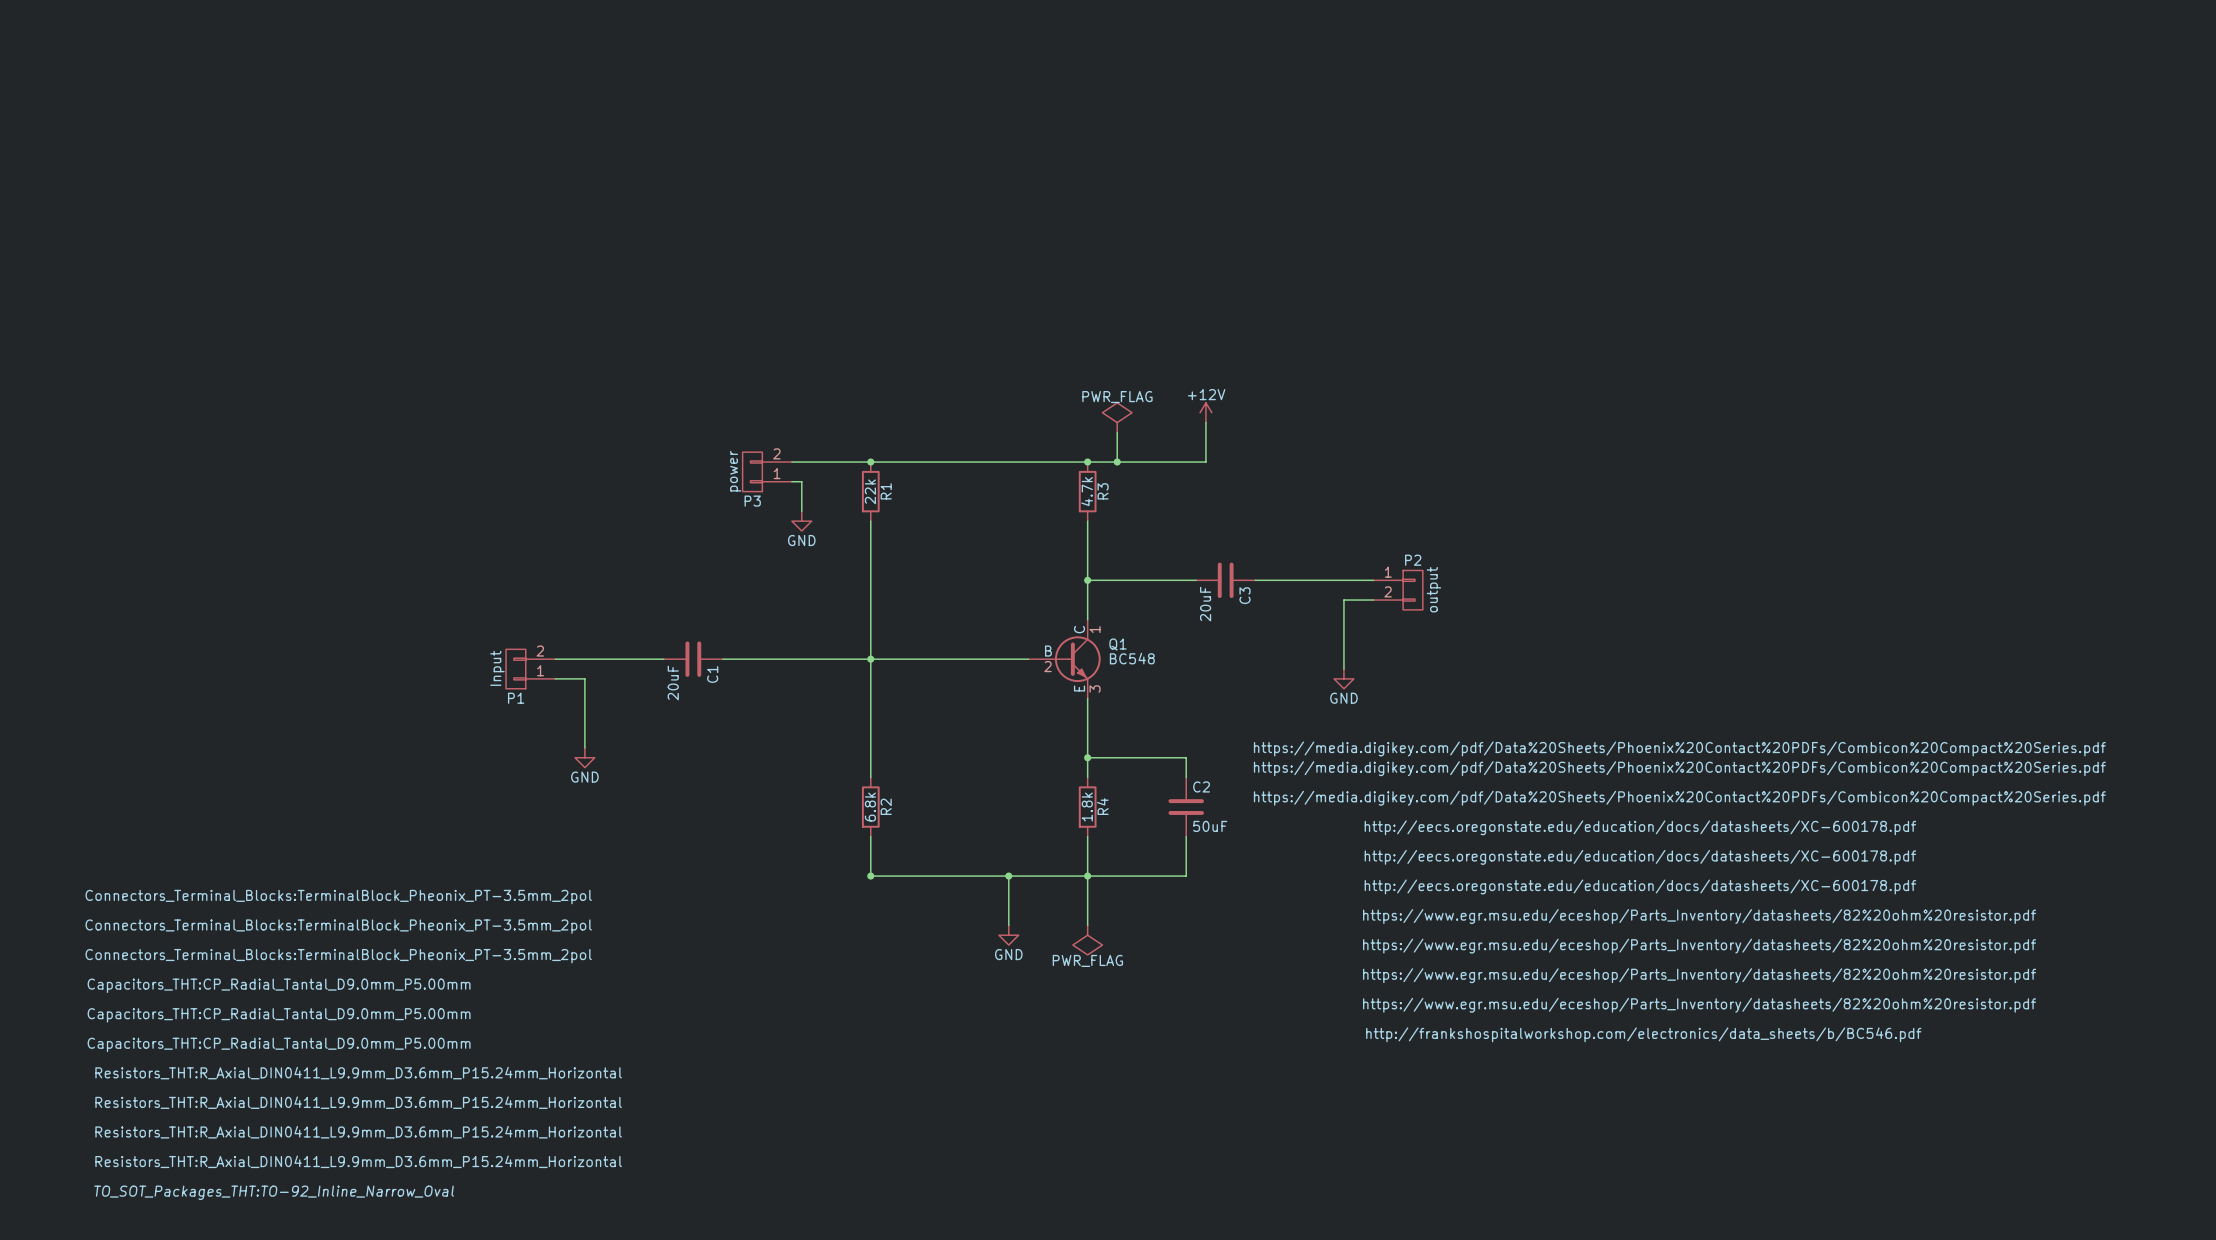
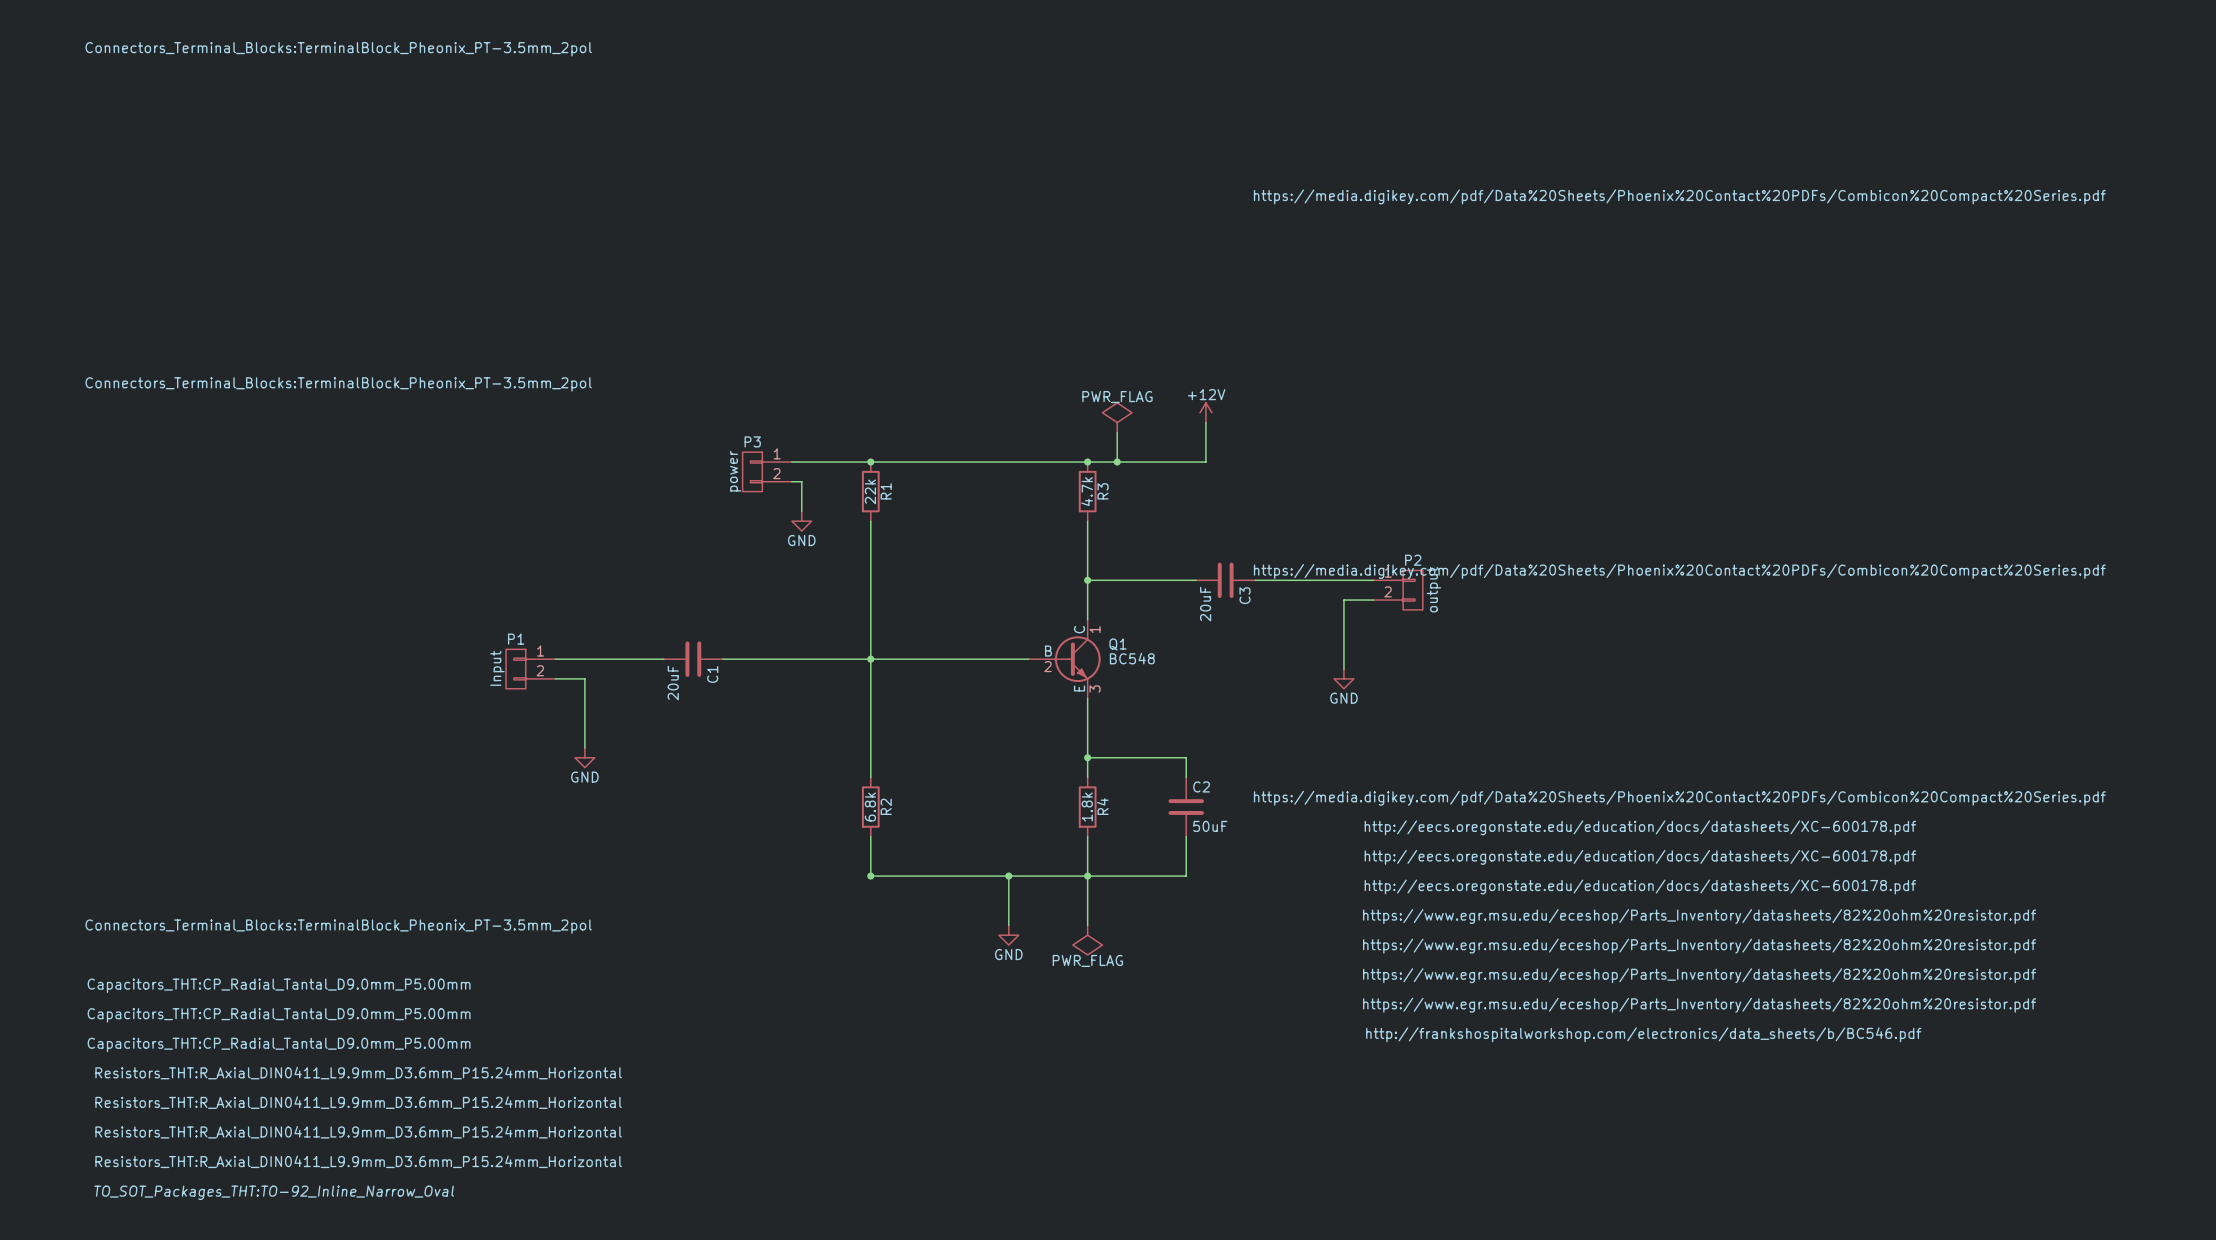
P3 flip: as is (752, 471) -> up-down (752, 471)
P1 flip: as is (515, 669) -> up-down (515, 669)

